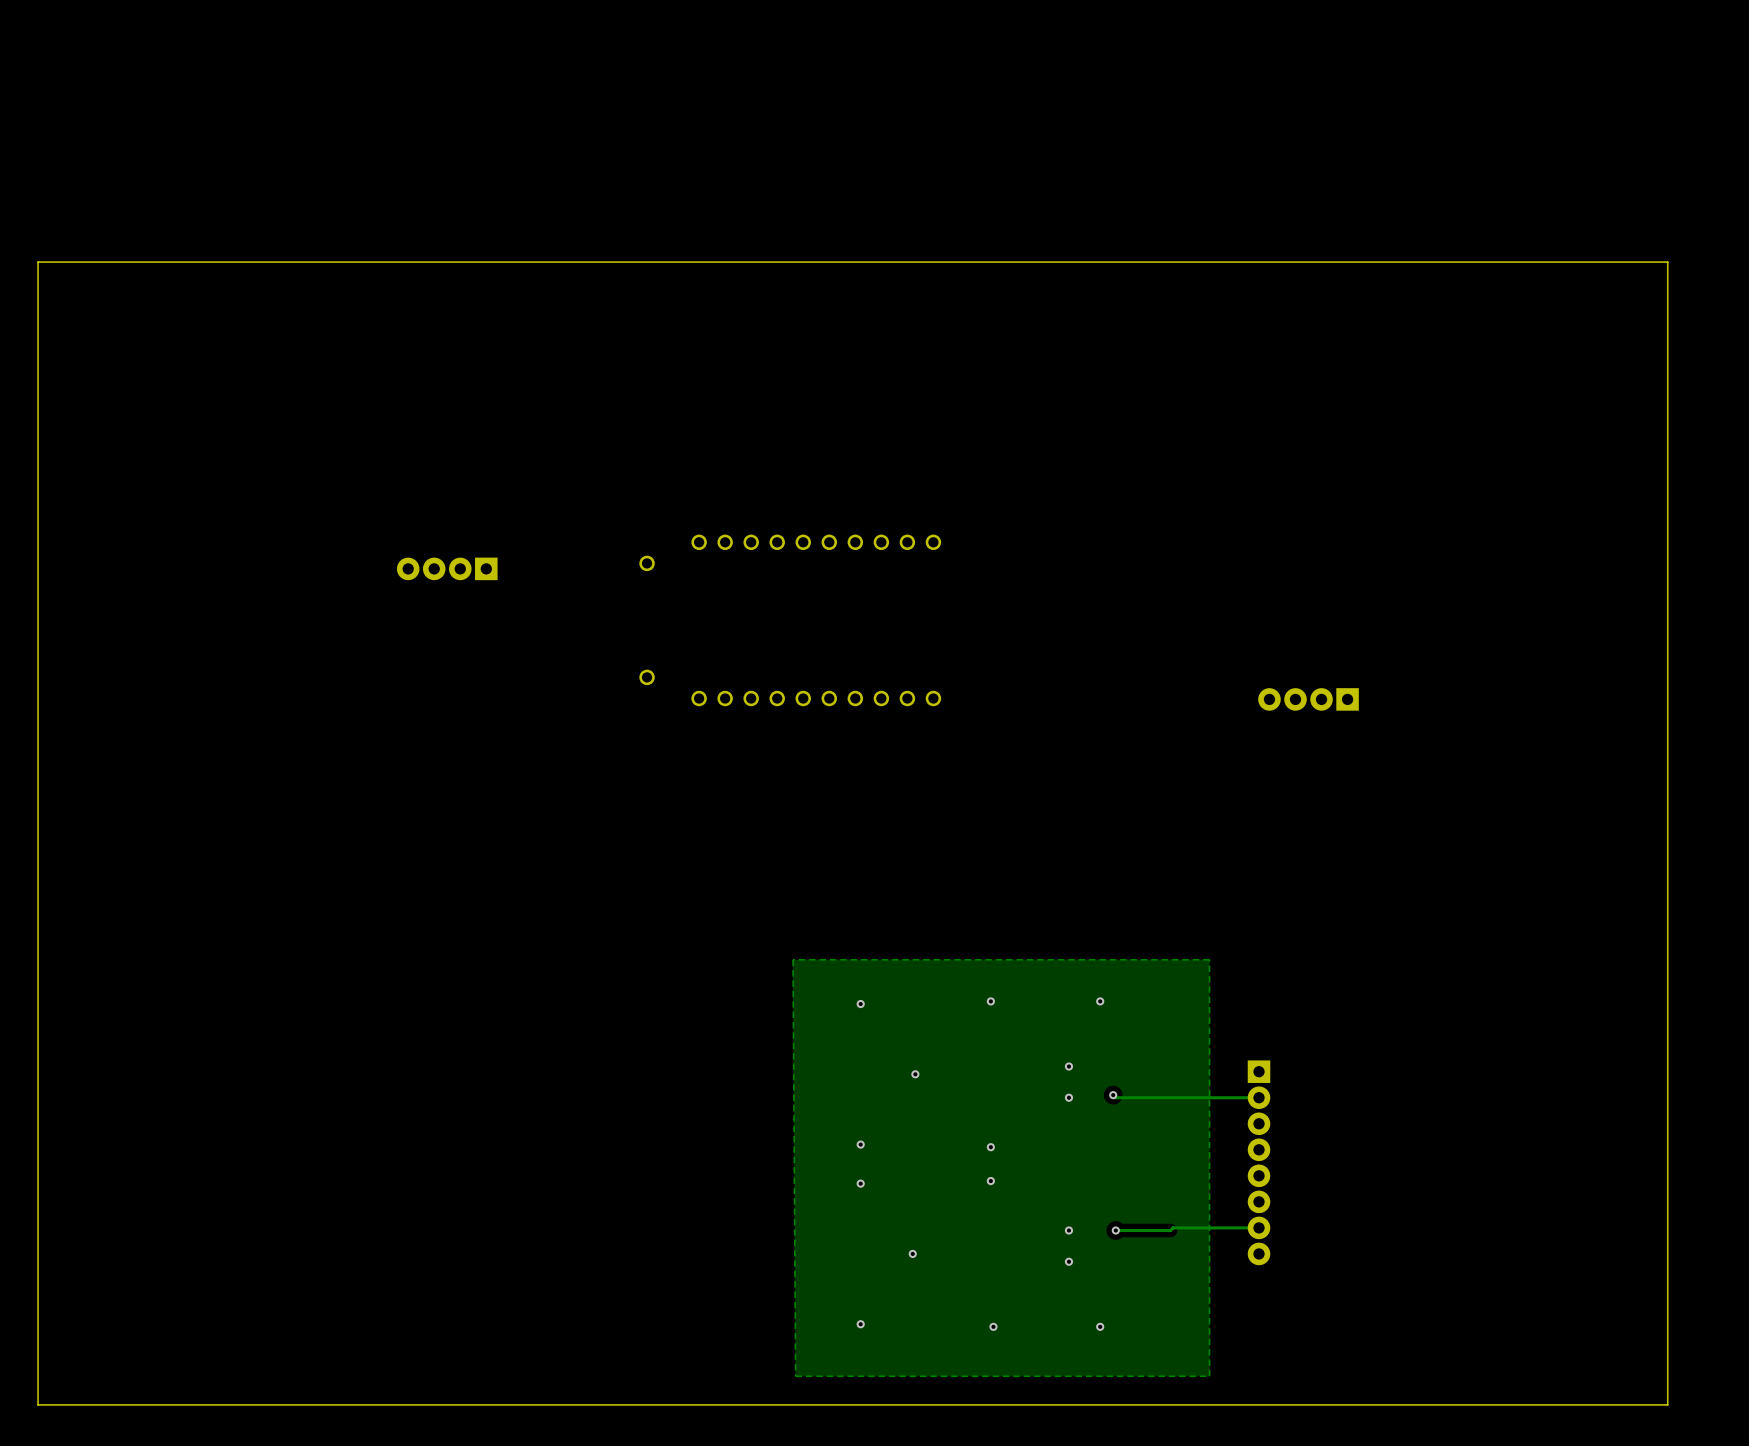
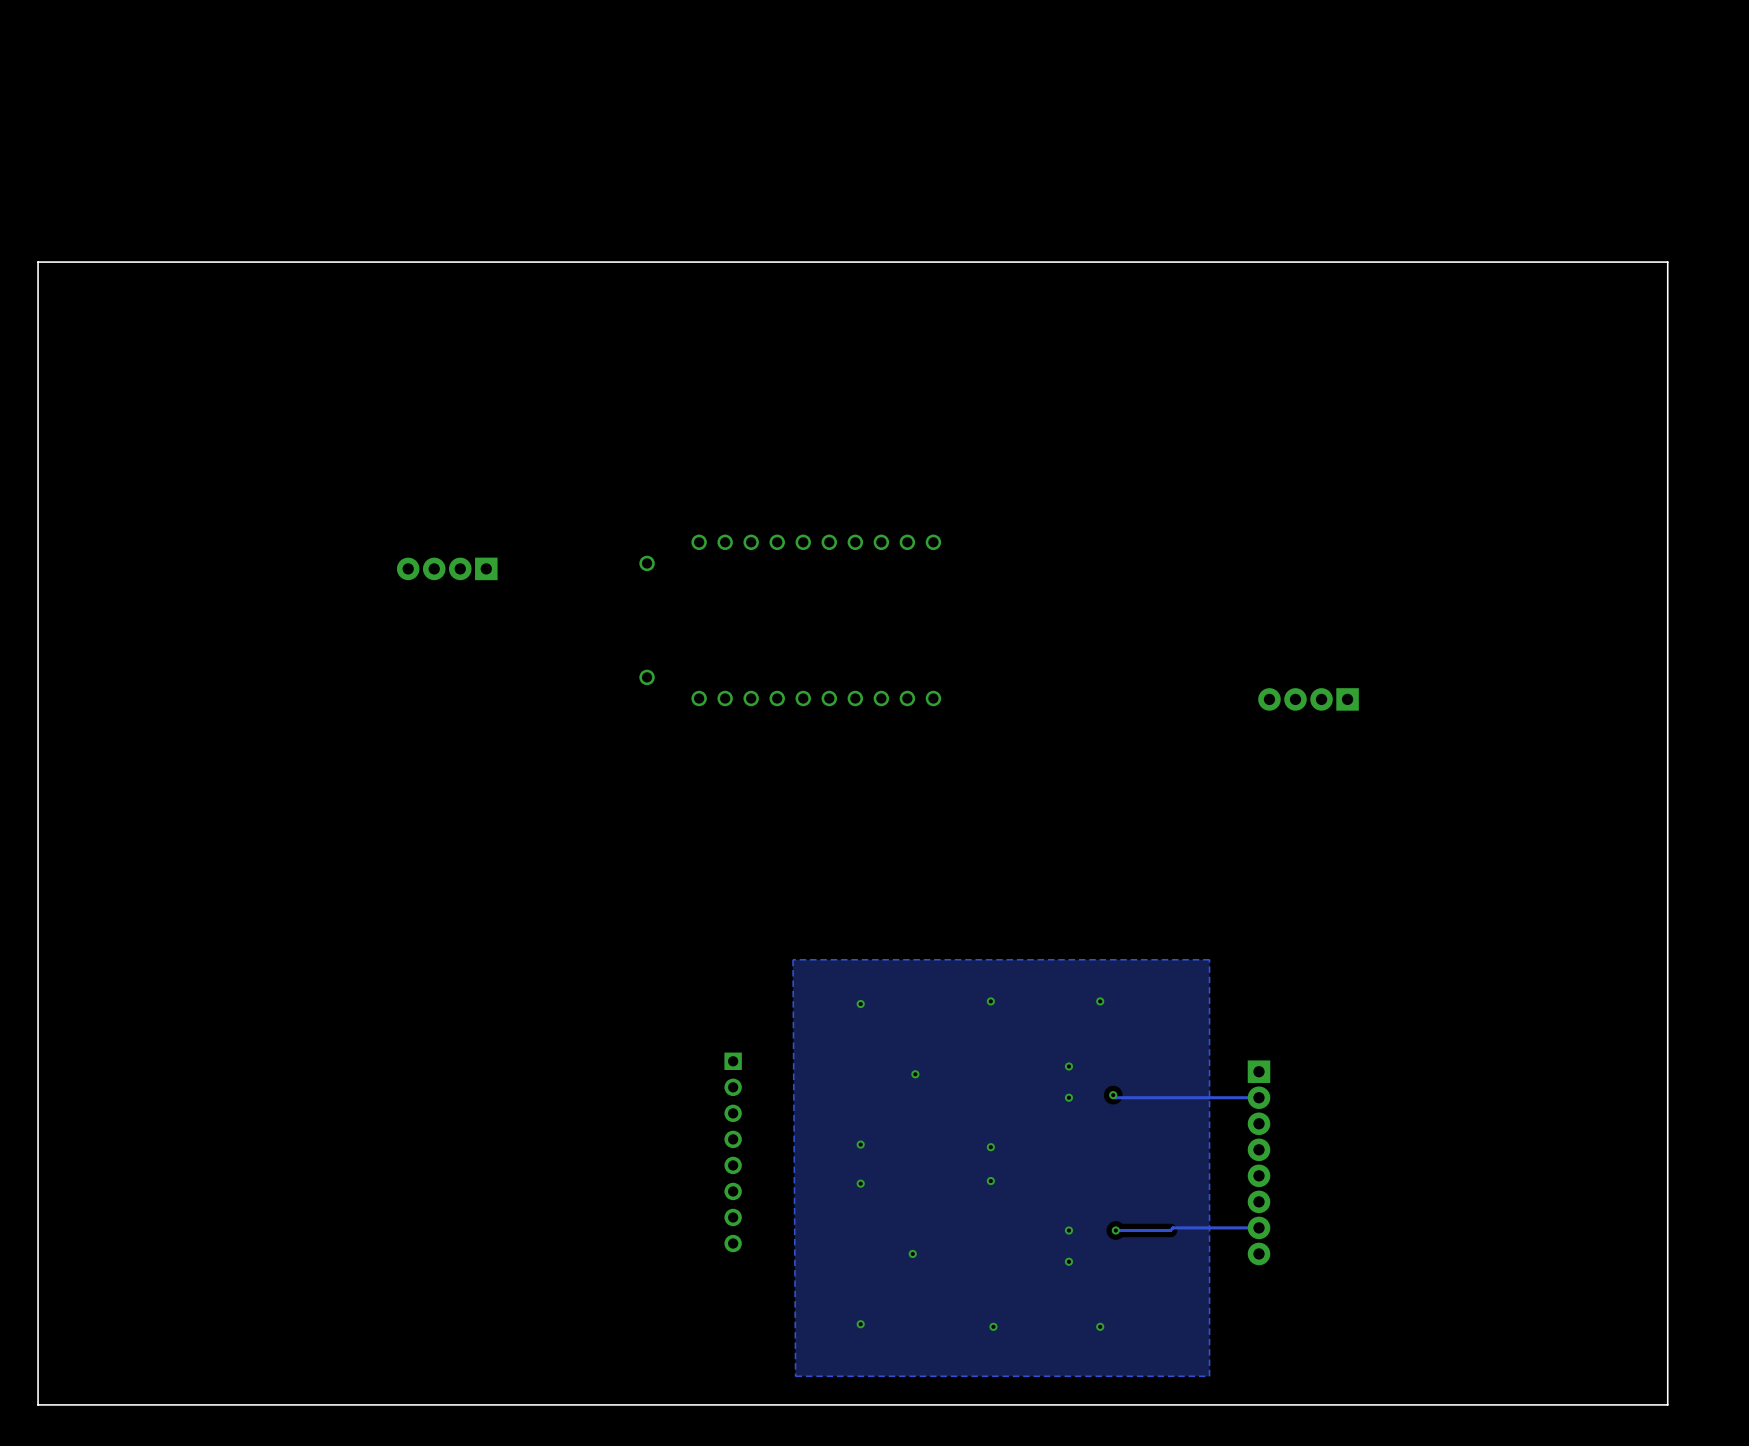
part: none -> (733, 1152)

